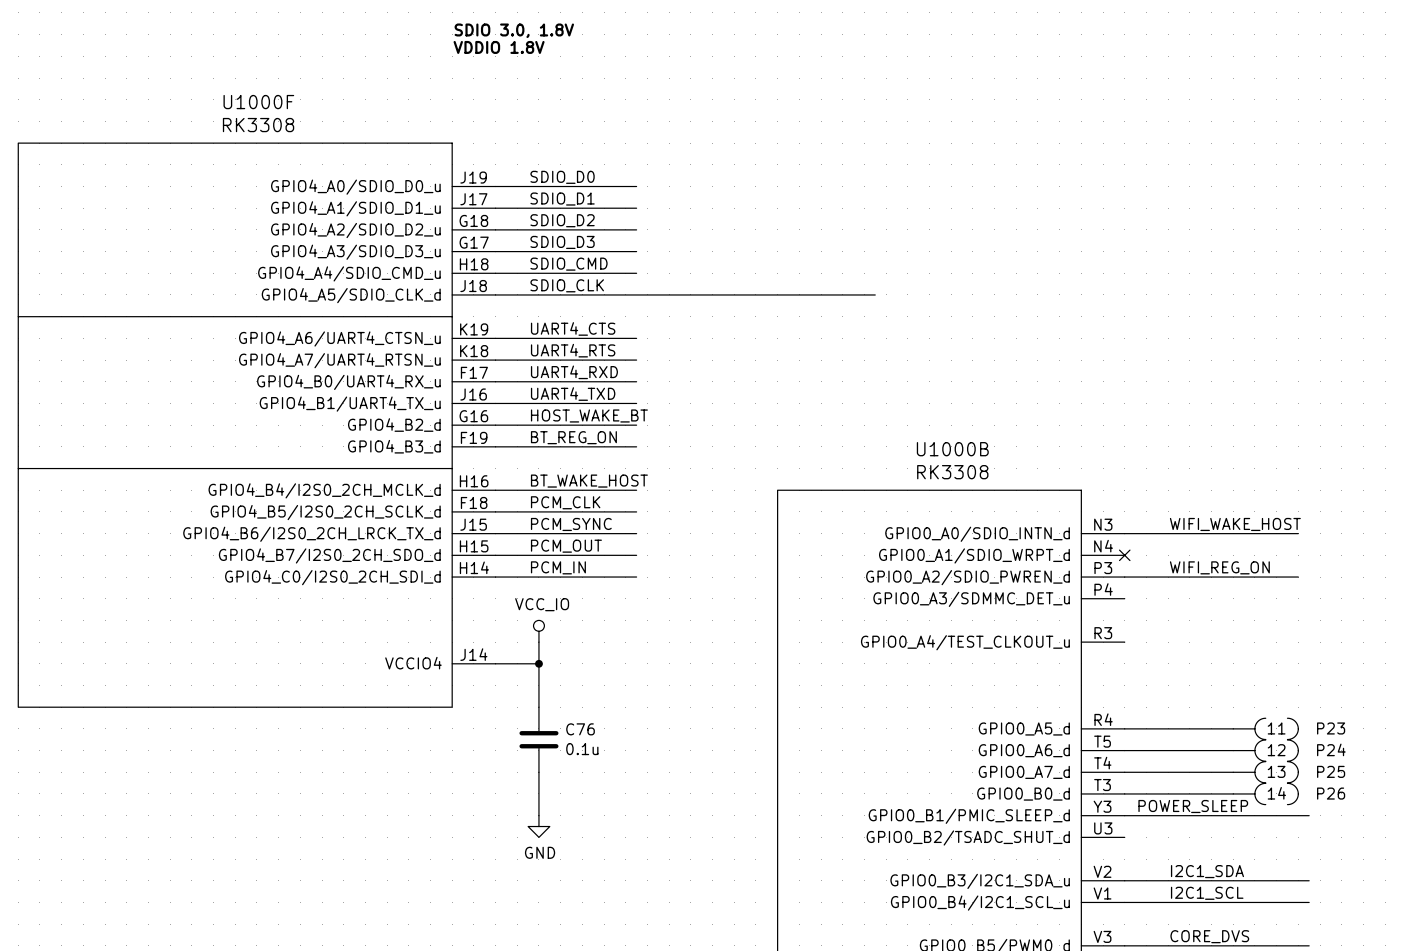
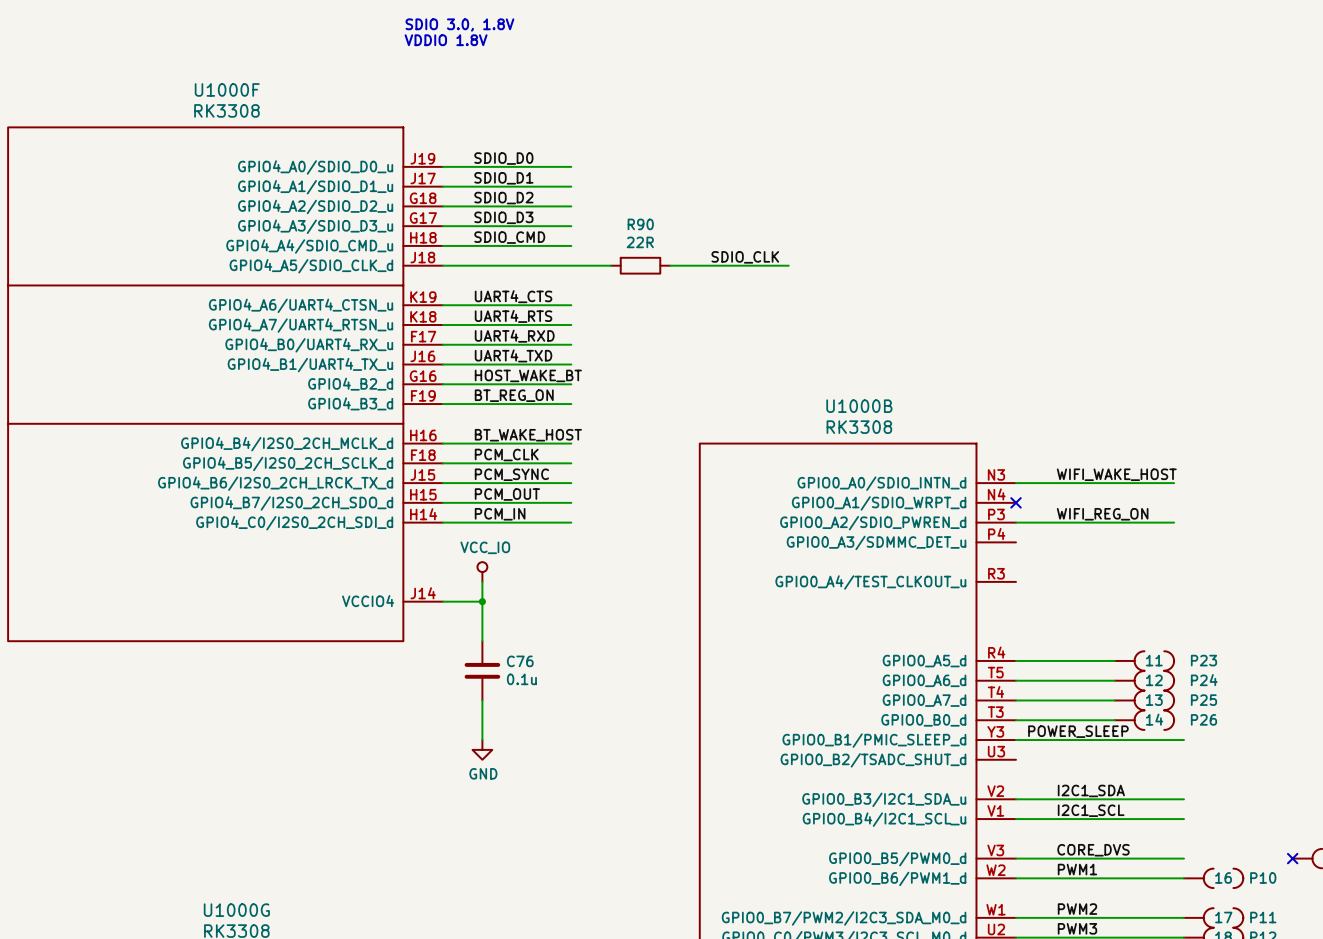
label: SDIO_CLK (567, 285) -> none
label: none -> SDIO_CLK (745, 257)
wire: (679, 294) (745, 294) -> none
R90: none -> 22R (640, 265)

